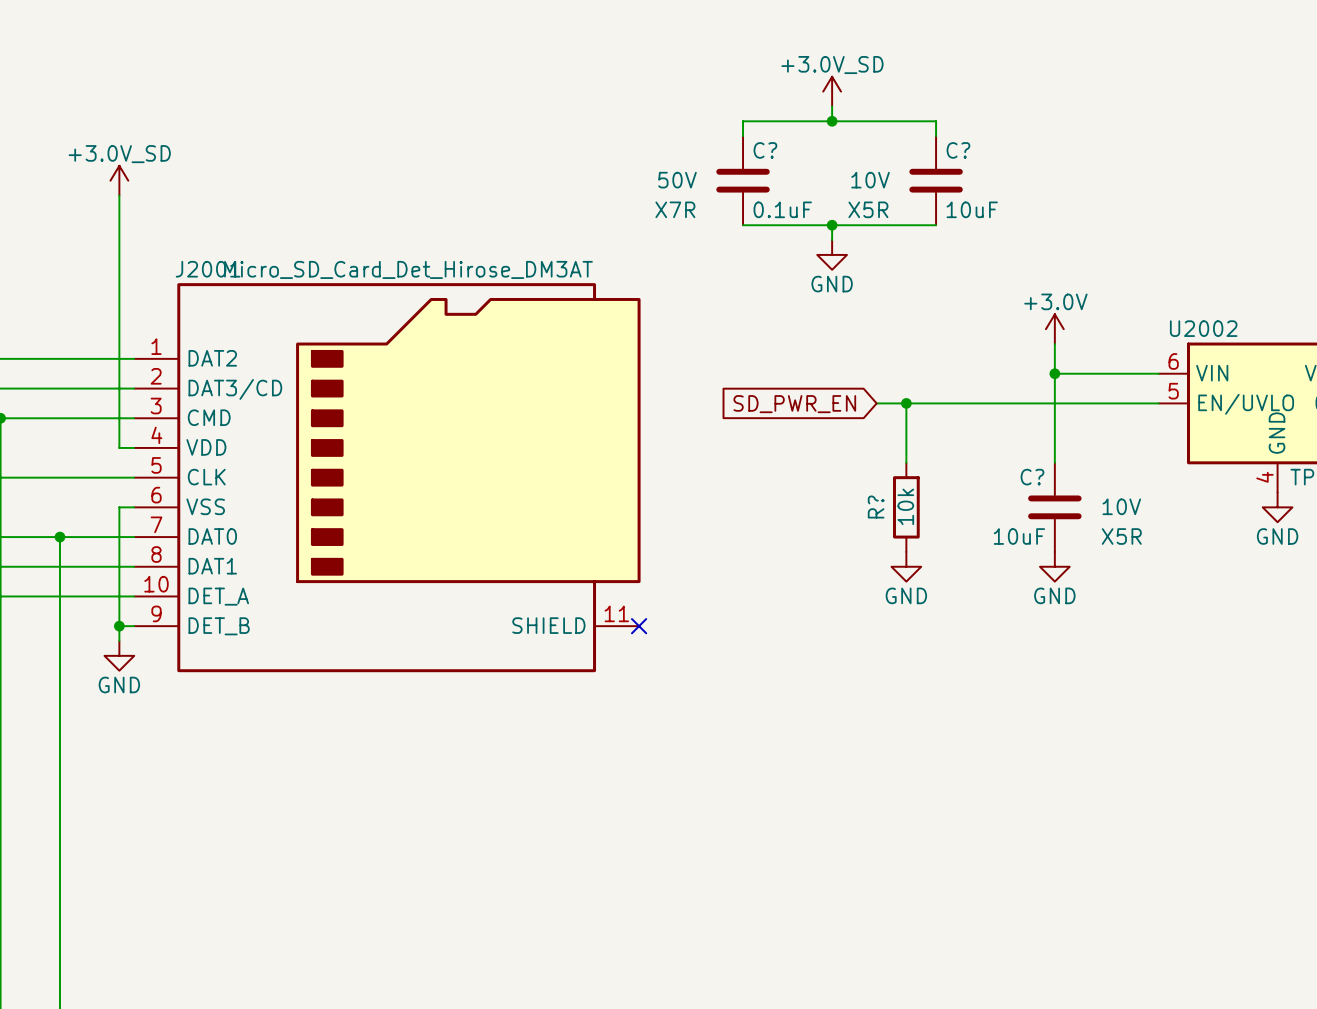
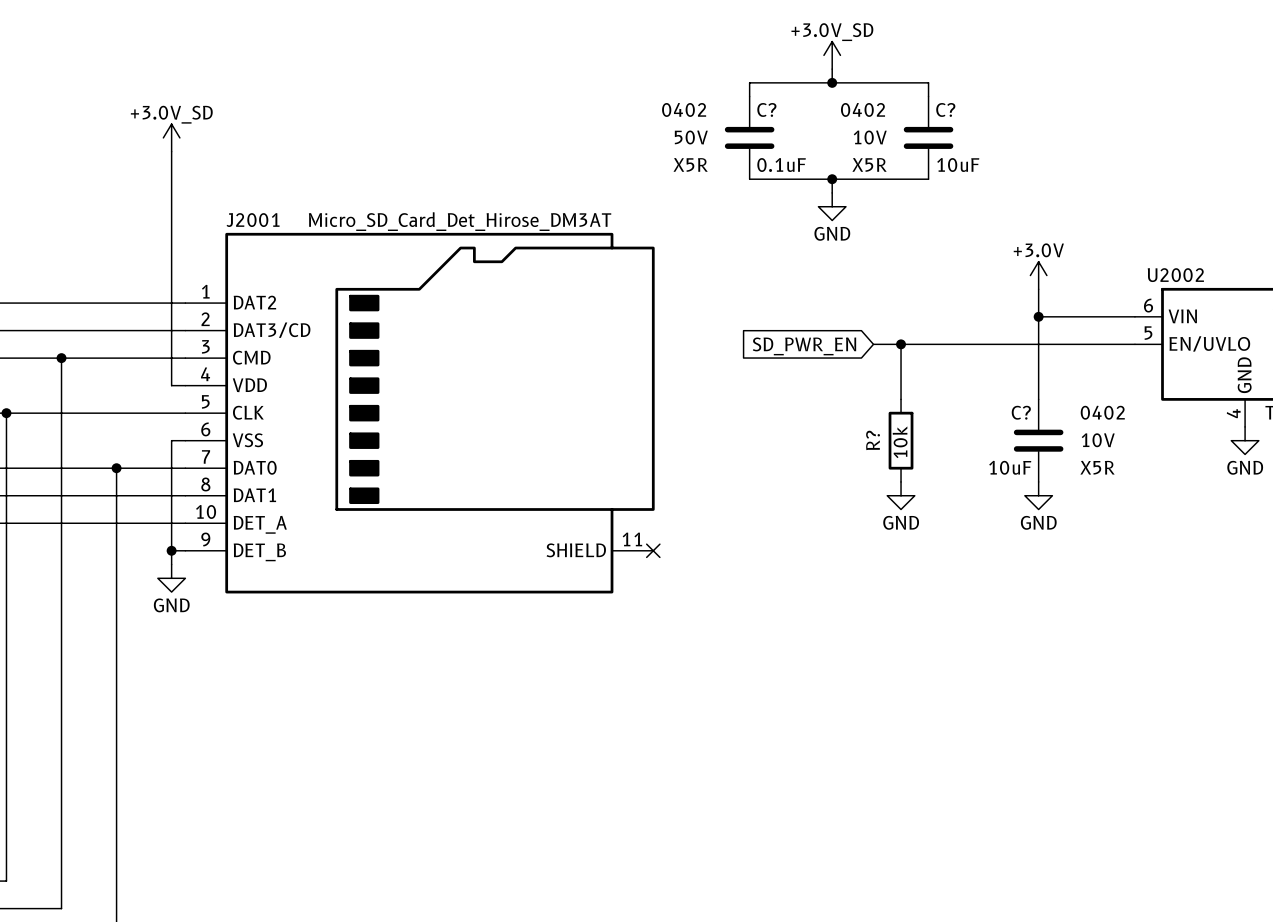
C? text: none -> 0402 (684, 109)
C? text: none -> 0402 (863, 109)
C? text: X7R (675, 209) -> X5R (690, 164)
C? text: none -> 0402 (1102, 412)

